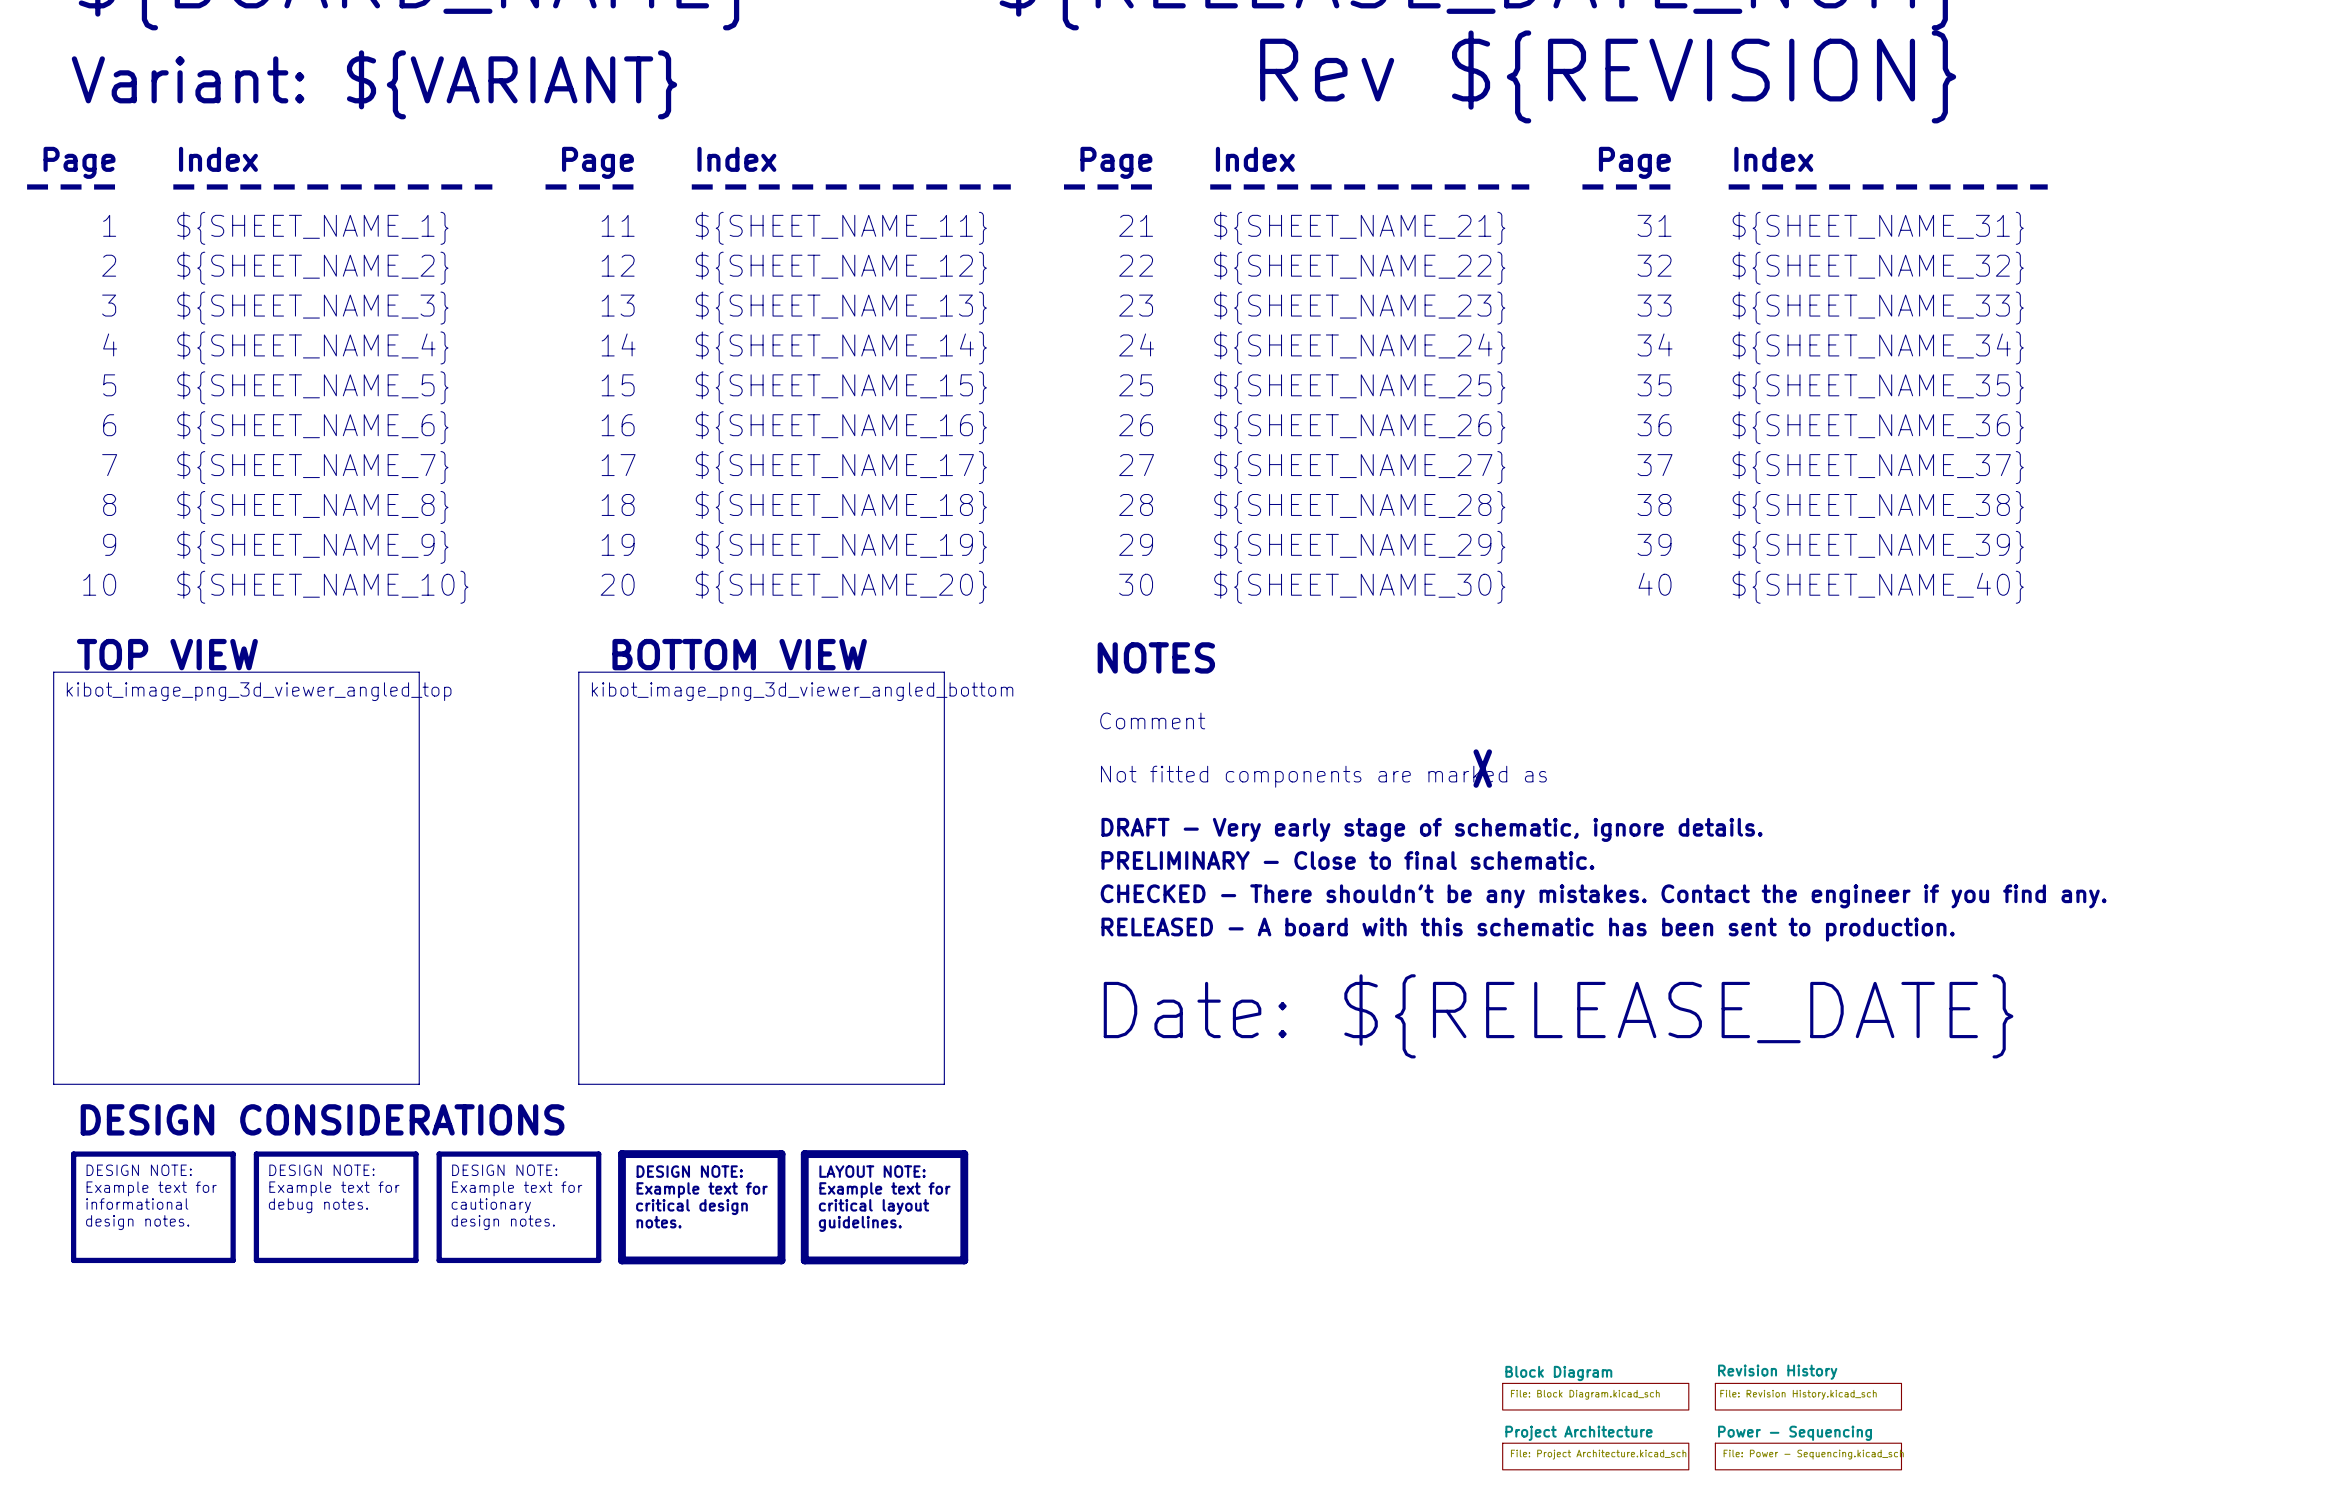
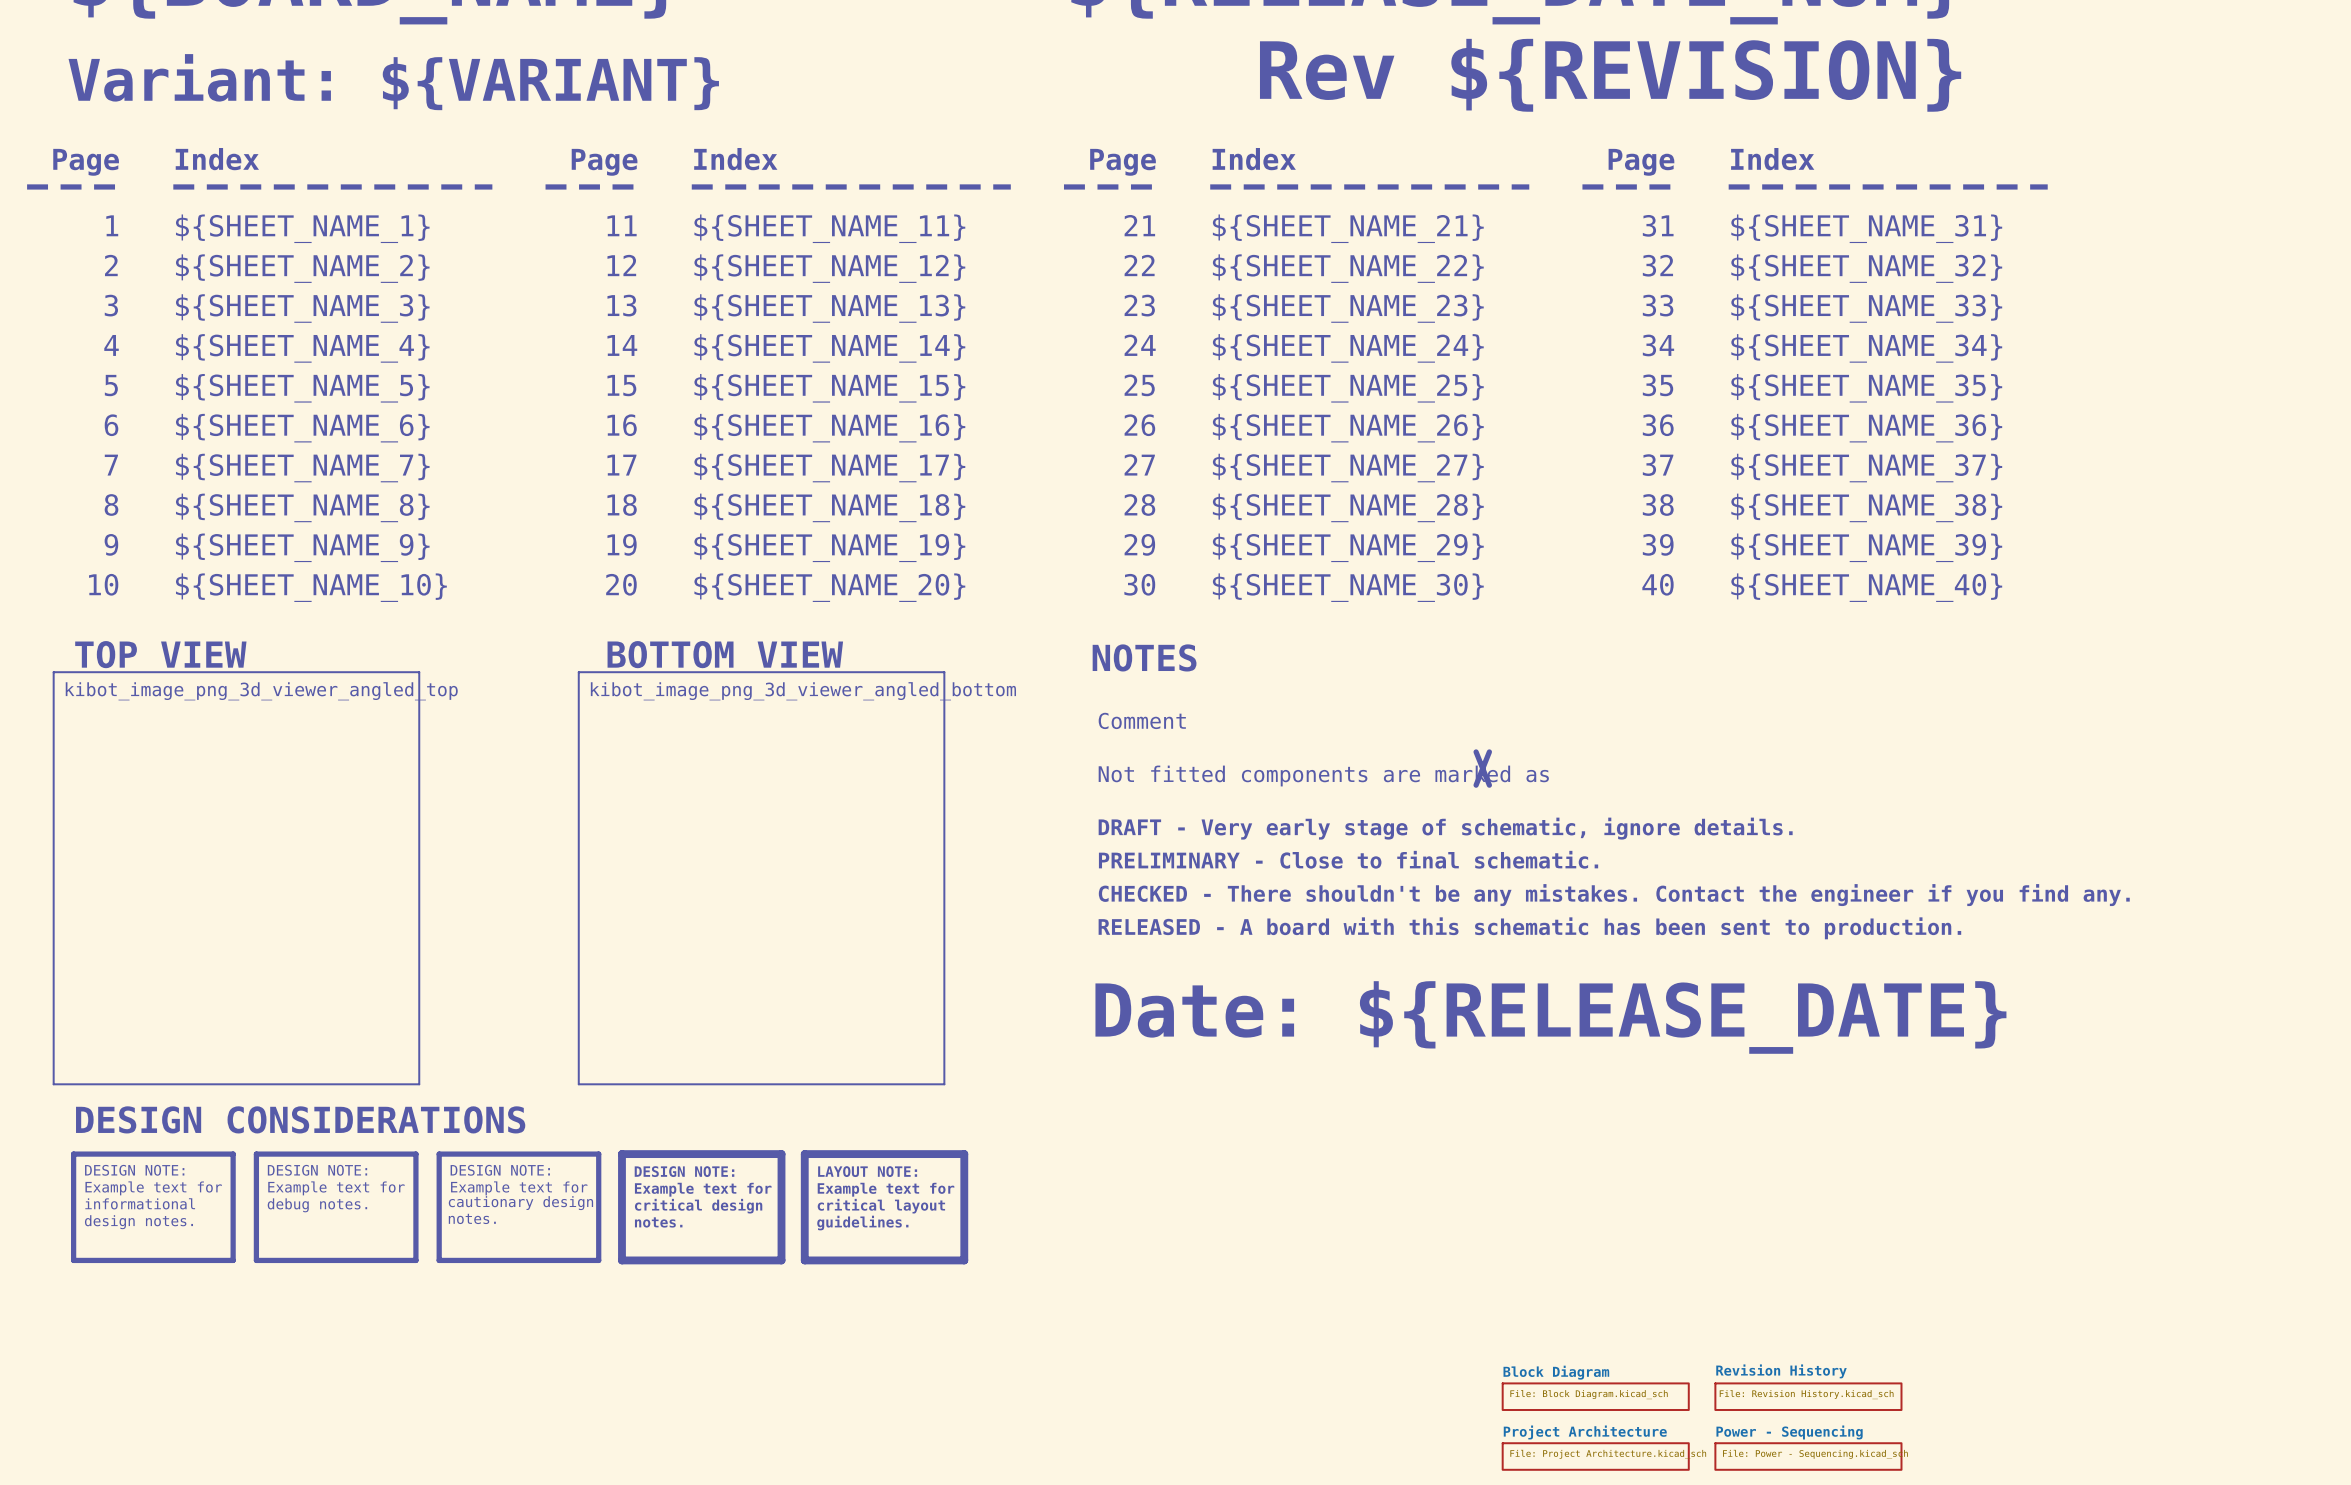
text: cautionary (491, 1205) -> cautionary design (520, 1203)
text: design notes. (503, 1222) -> notes. (472, 1218)

